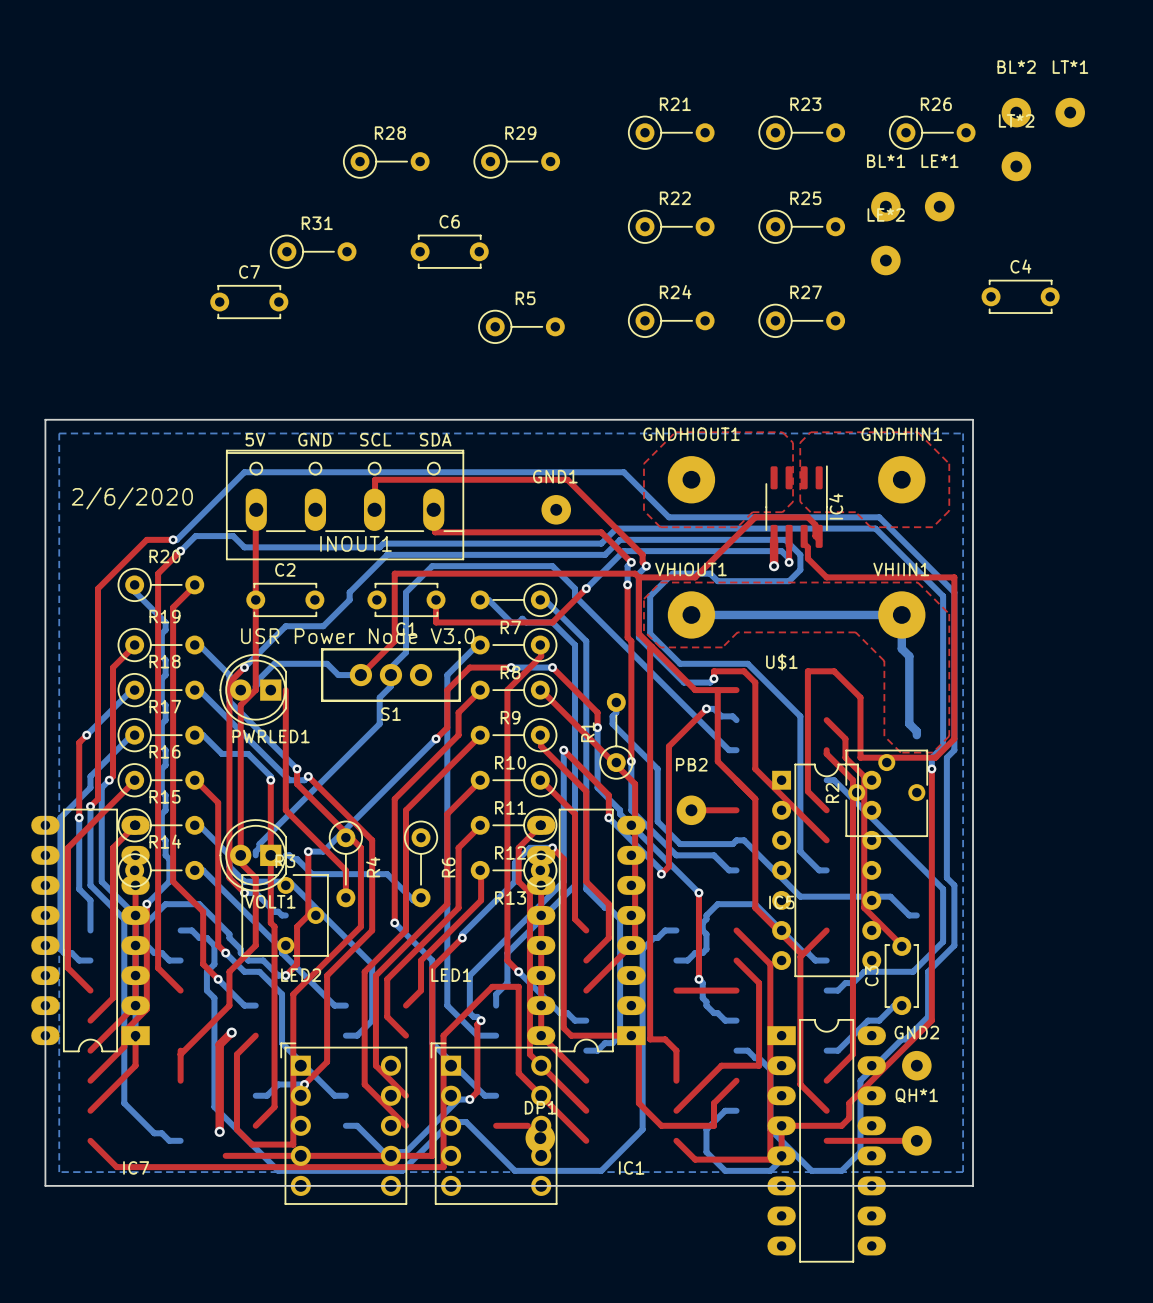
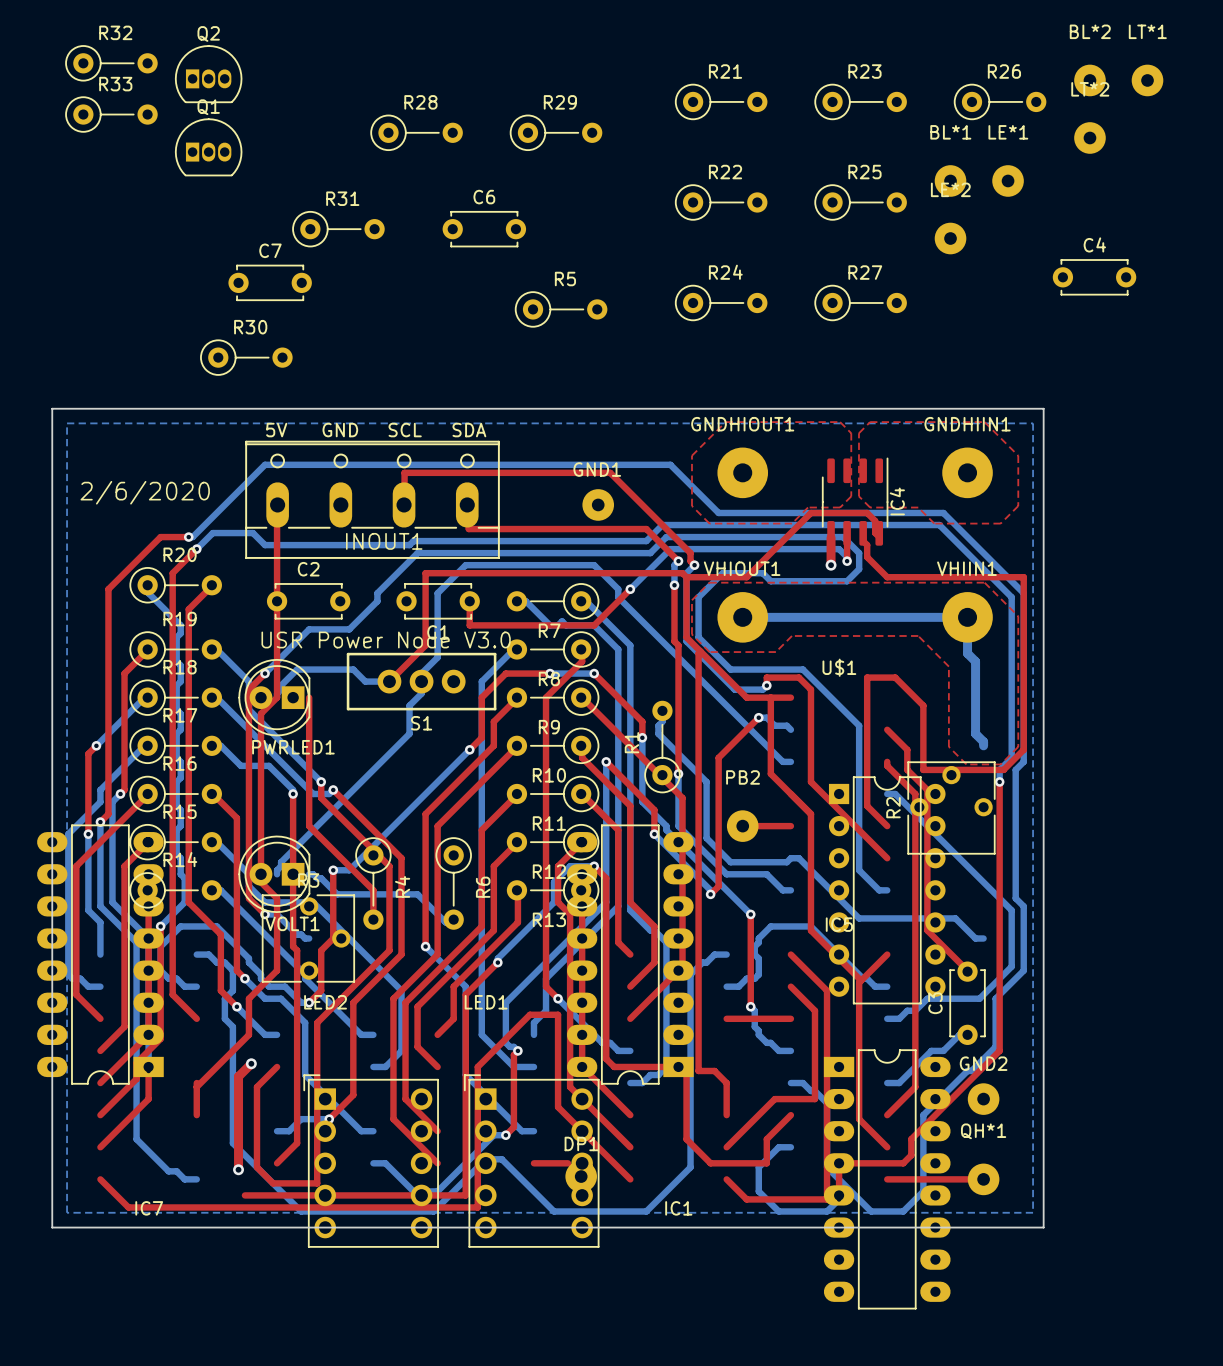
R32: none -> (111, 63)
Q2: none -> (208, 74)
R33: none -> (111, 114)
Q1: none -> (208, 147)
R30: none -> (246, 357)

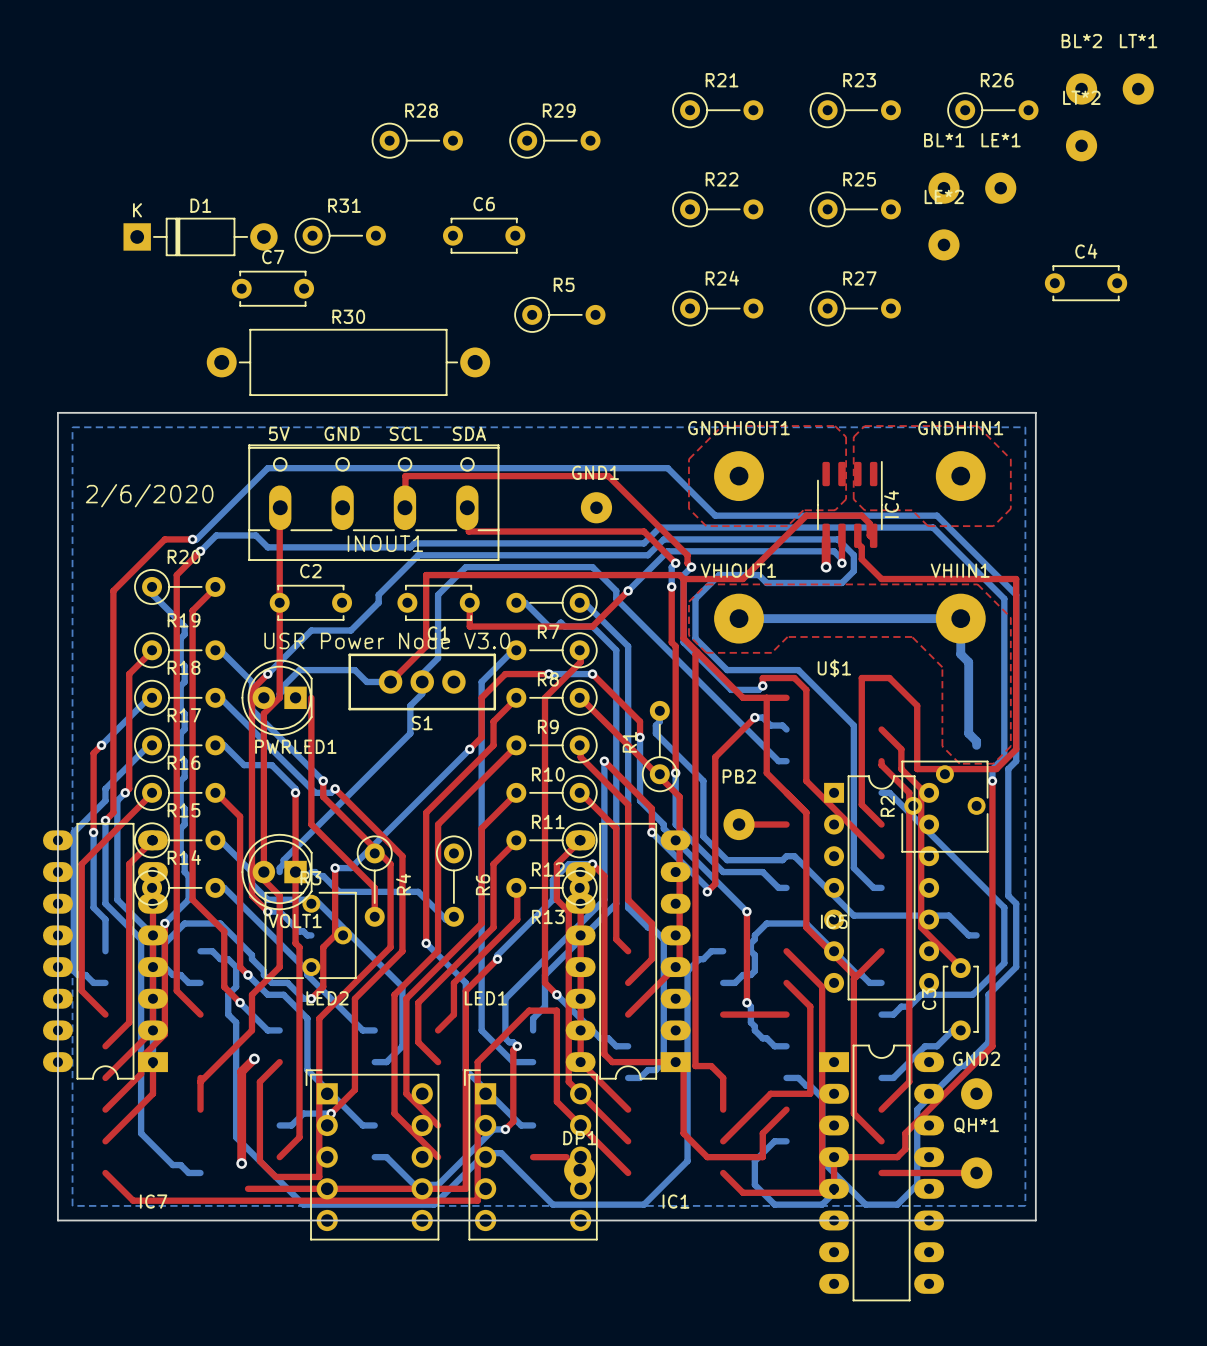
R32: (111, 63) -> none
Q2: (208, 74) -> none
R33: (111, 114) -> none
Q1: (208, 147) -> none
D1: none -> (200, 236)
R30 footprint: [200, 339, 293, 376] -> [206, 328, 491, 396]

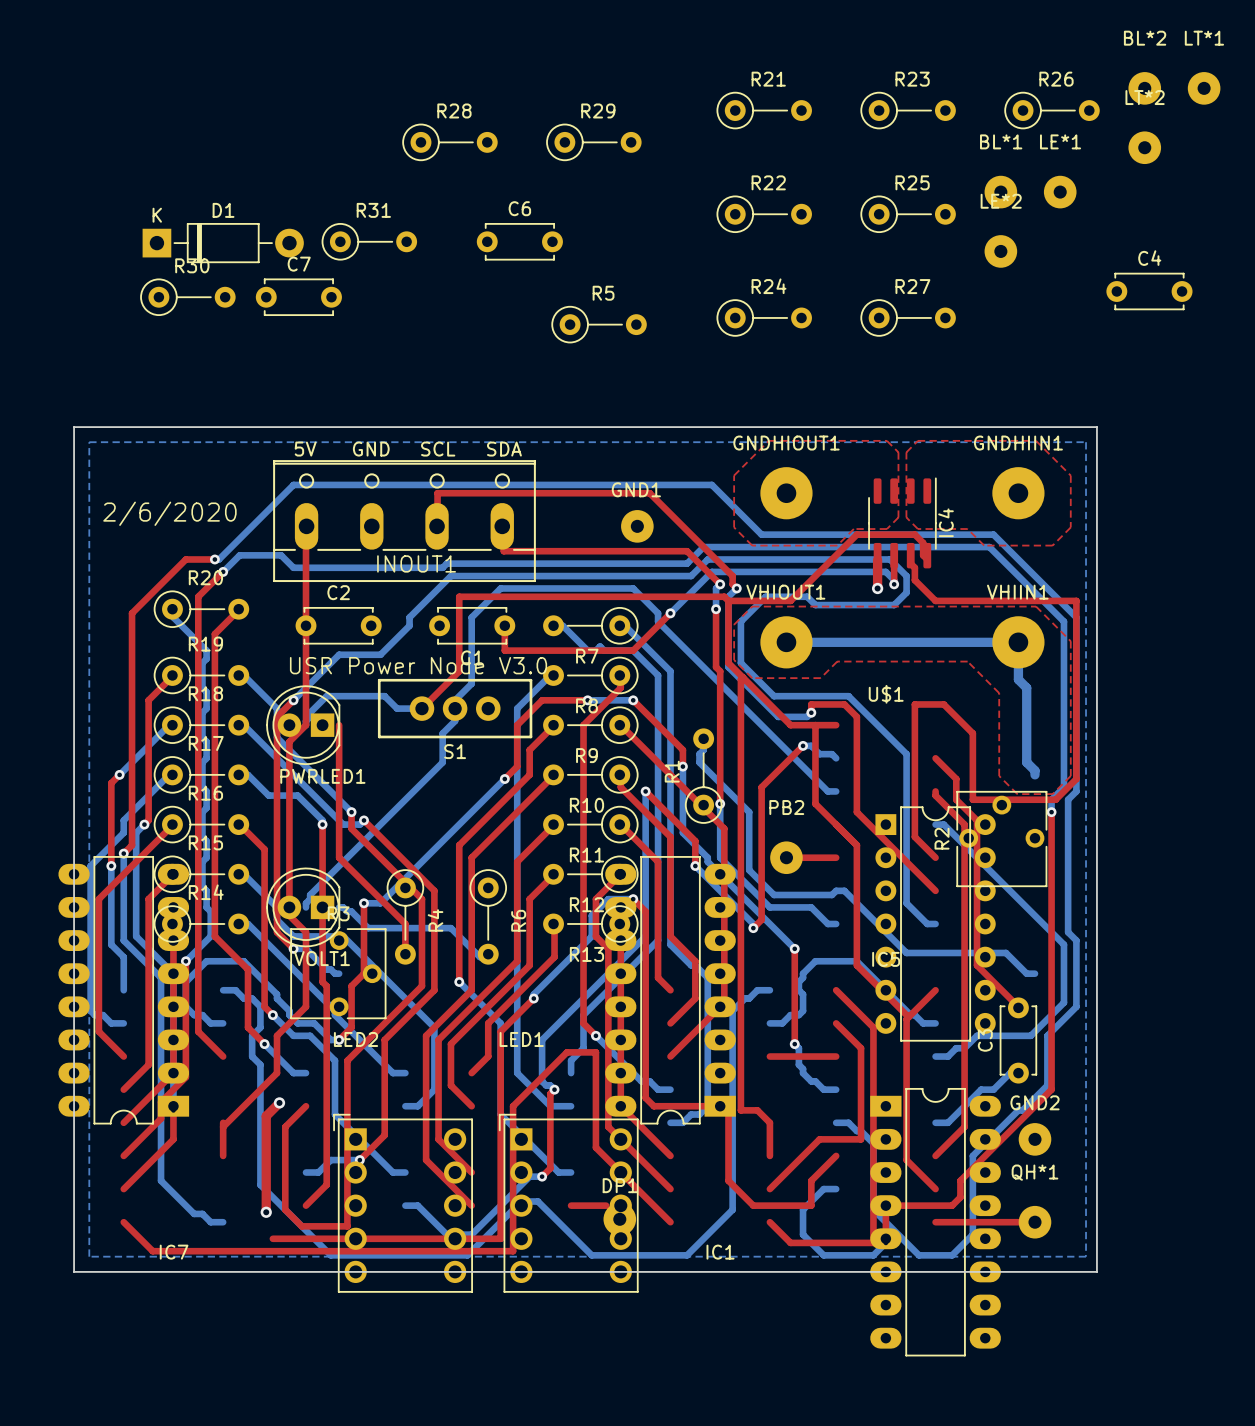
R30 footprint: [206, 328, 491, 396] -> [140, 278, 236, 316]

